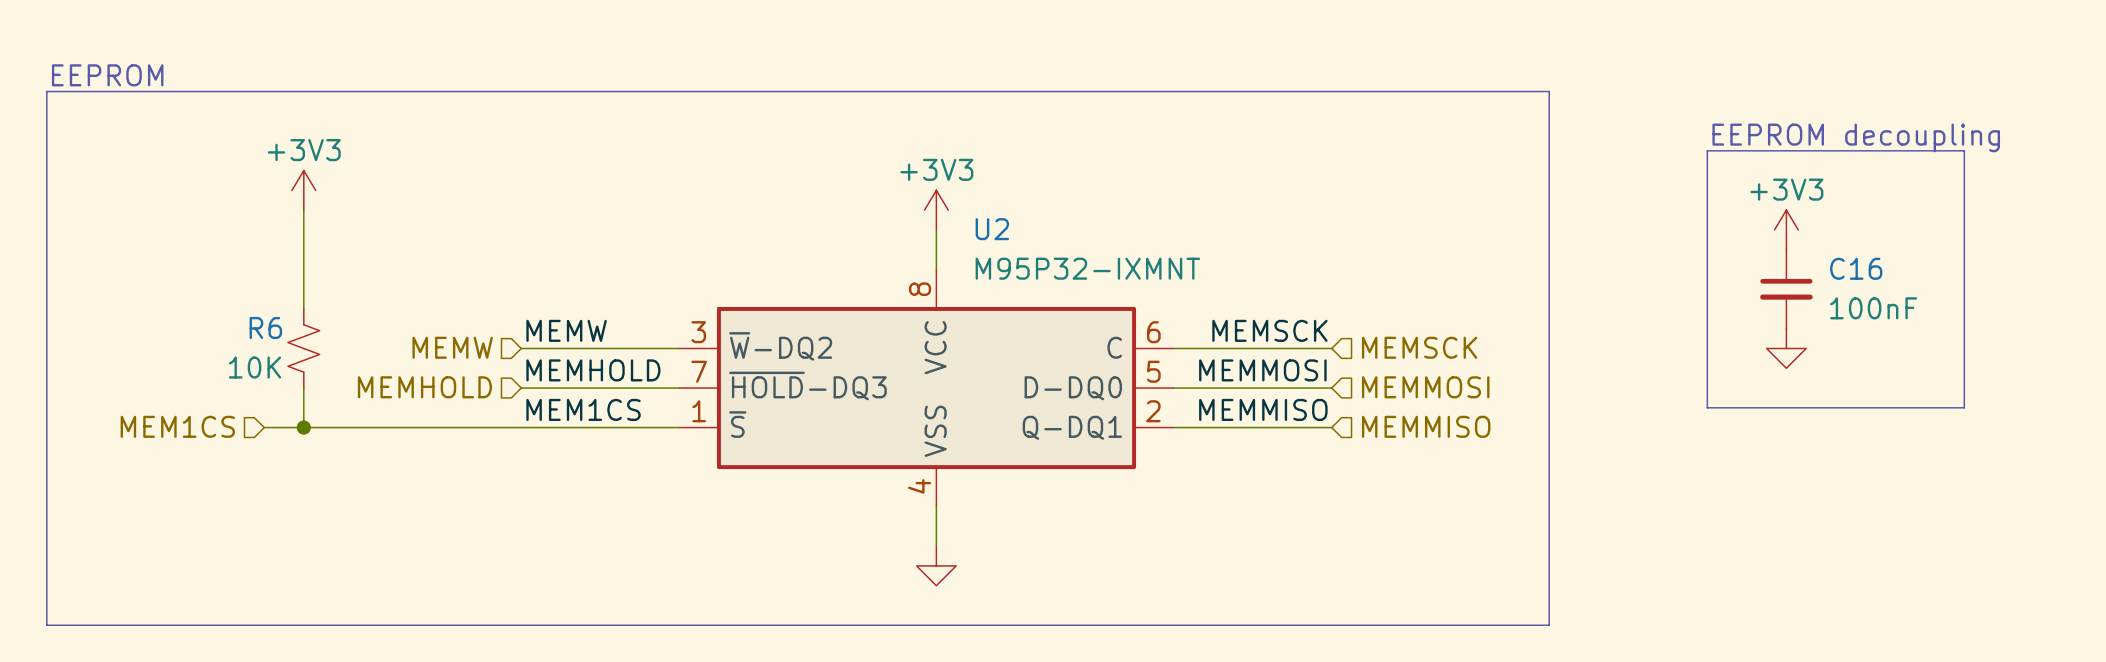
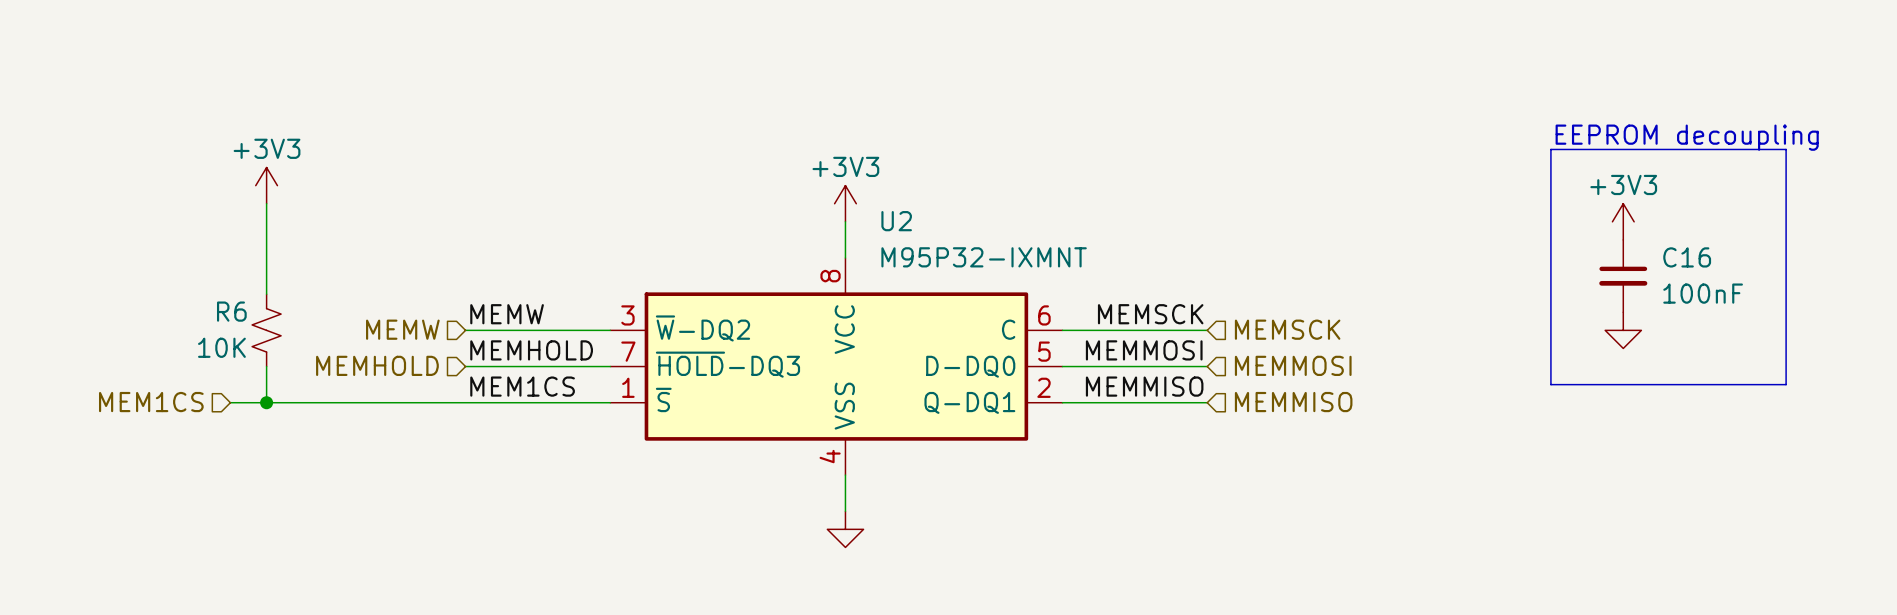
text: EEPROM (107, 75) -> none
line: (46, 91) (1549, 91) (1549, 625) (46, 625) (46, 91) -> none

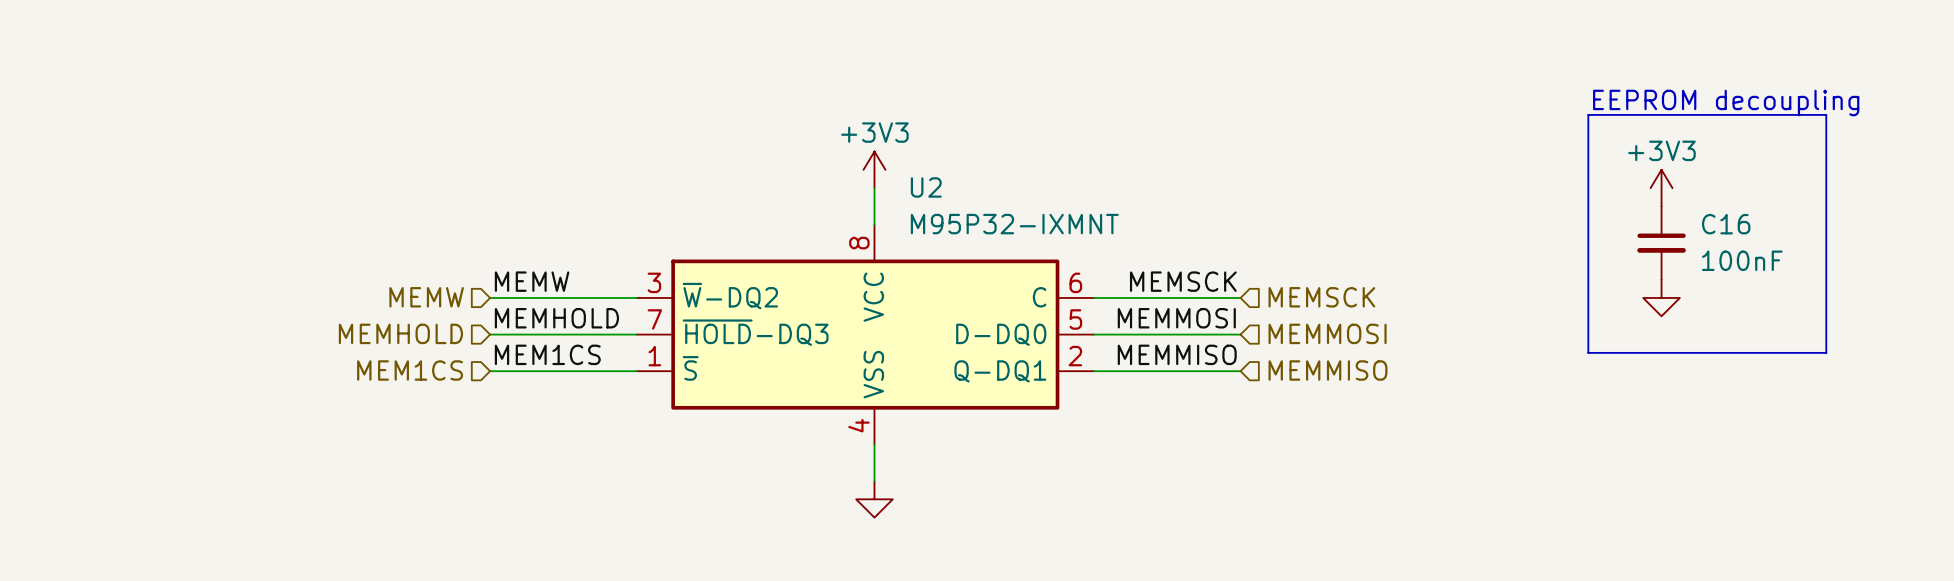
power symbol: +3V3 (266, 185) -> none
wire: (266, 203) (266, 294) -> none
R6: 10K (266, 330) -> none
wire: (266, 366) (266, 402) -> none
hierarchical label position: MEM1CS (151, 402) -> MEM1CS (410, 370)
wire: (230, 402) (465, 402) -> none
junction: (266, 402) -> none

